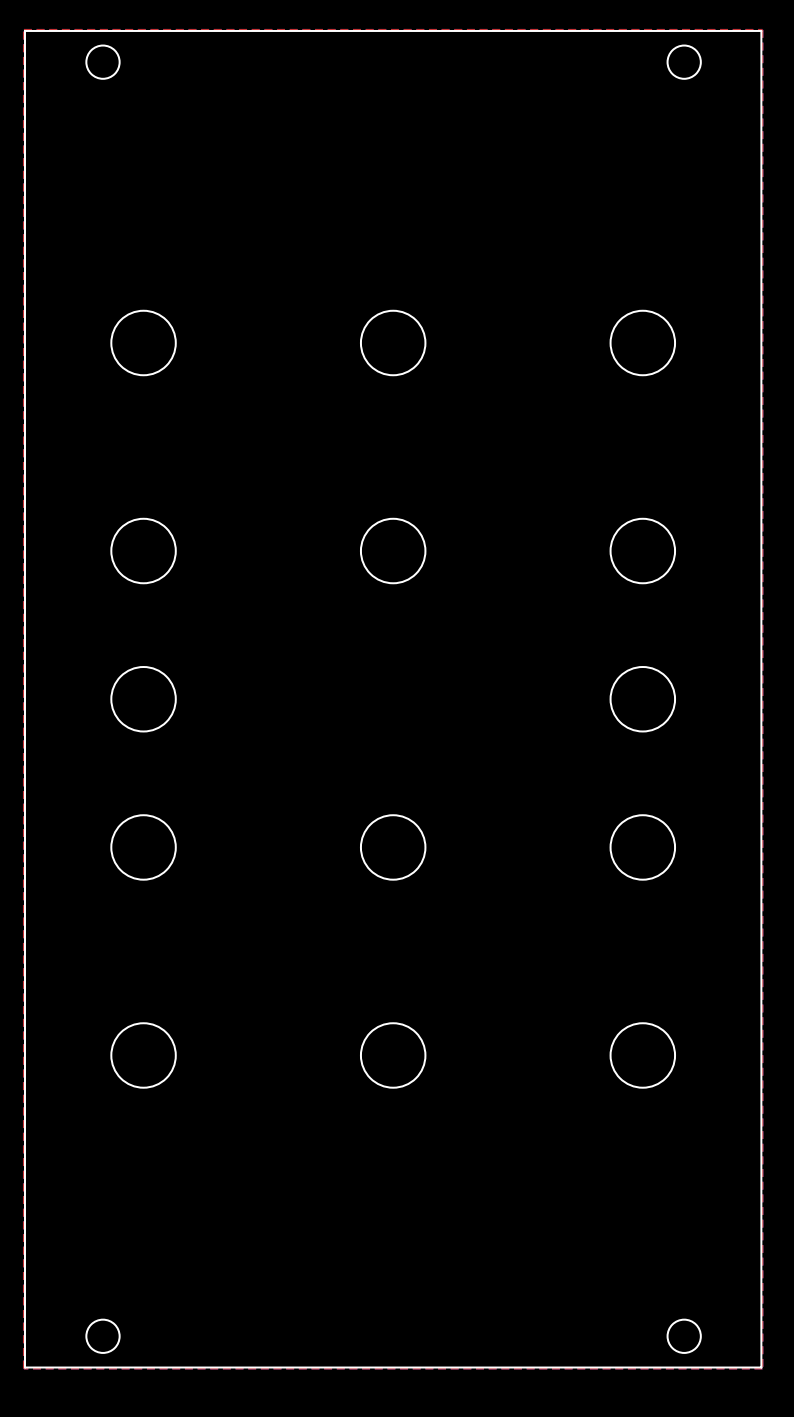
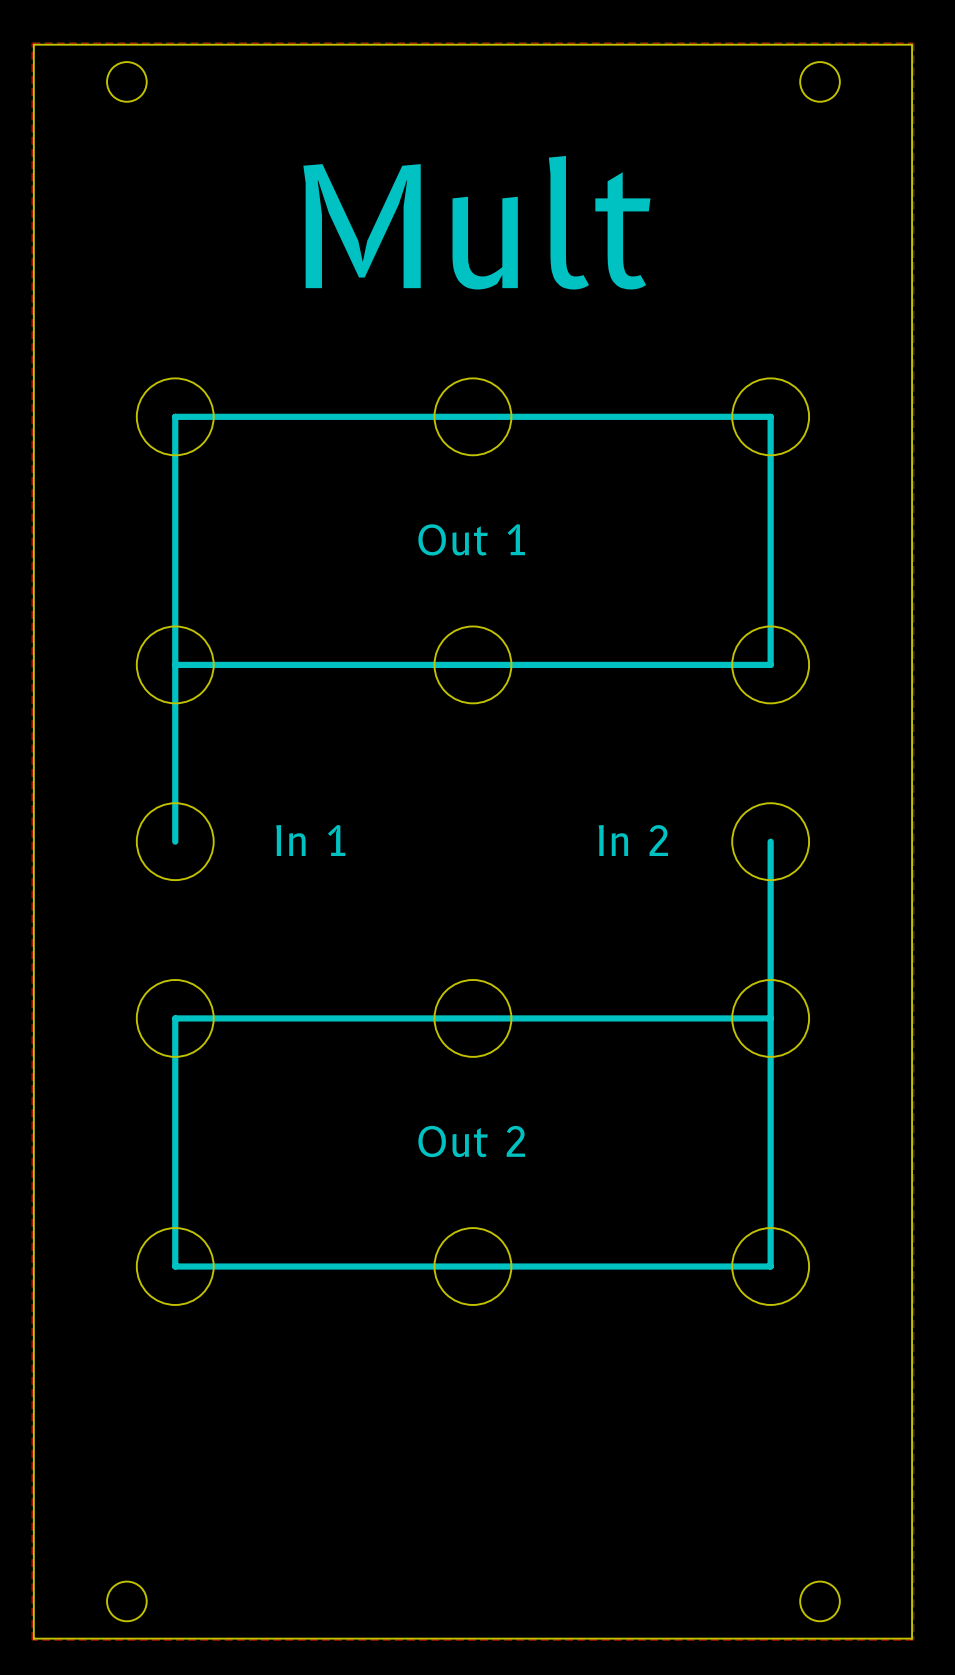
text: none -> Mult (476, 222)
text: none -> Out 1 (471, 539)
line: none -> (175, 664) (770, 664) (770, 416) (175, 416) (175, 841)
text: none -> In 1 (310, 840)
text: none -> In 2 (633, 840)
line: none -> (770, 841) (770, 1266) (175, 1266) (175, 1018) (770, 1018)
text: none -> Out 2 (471, 1141)

